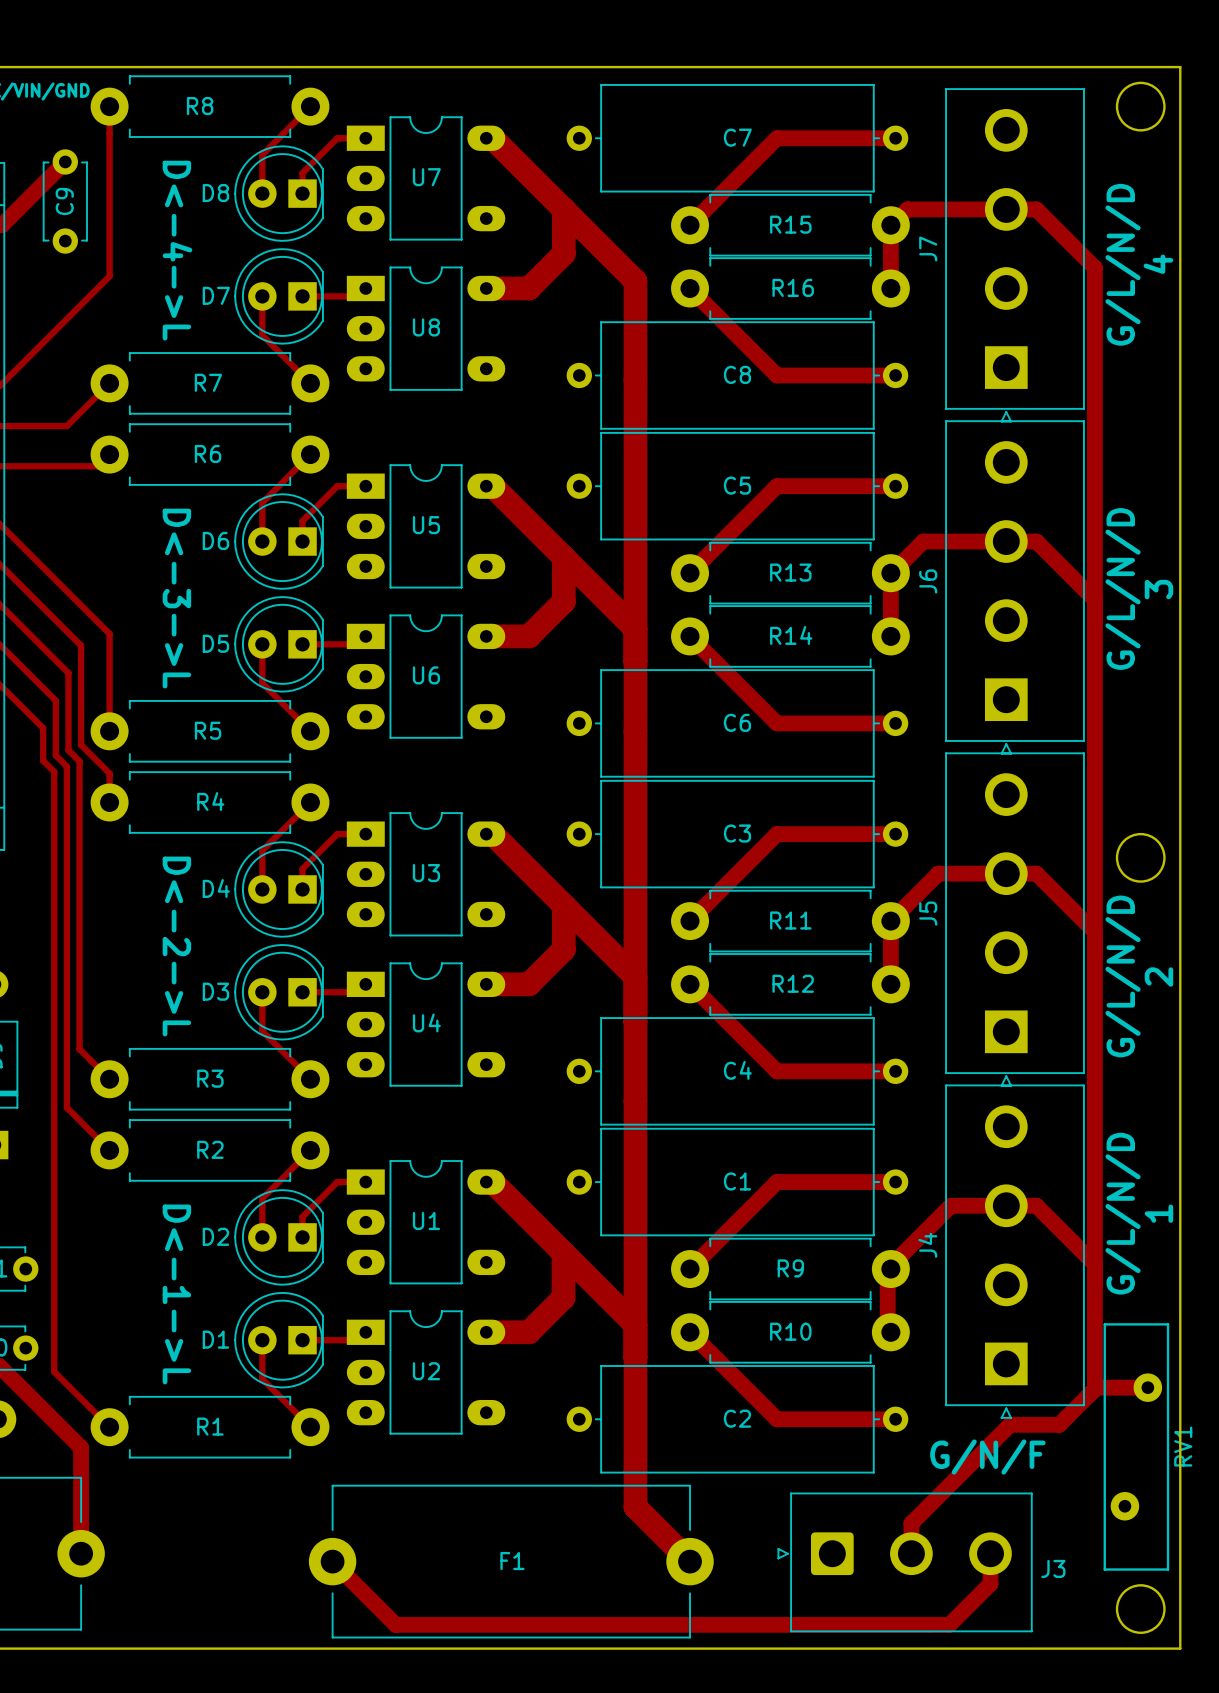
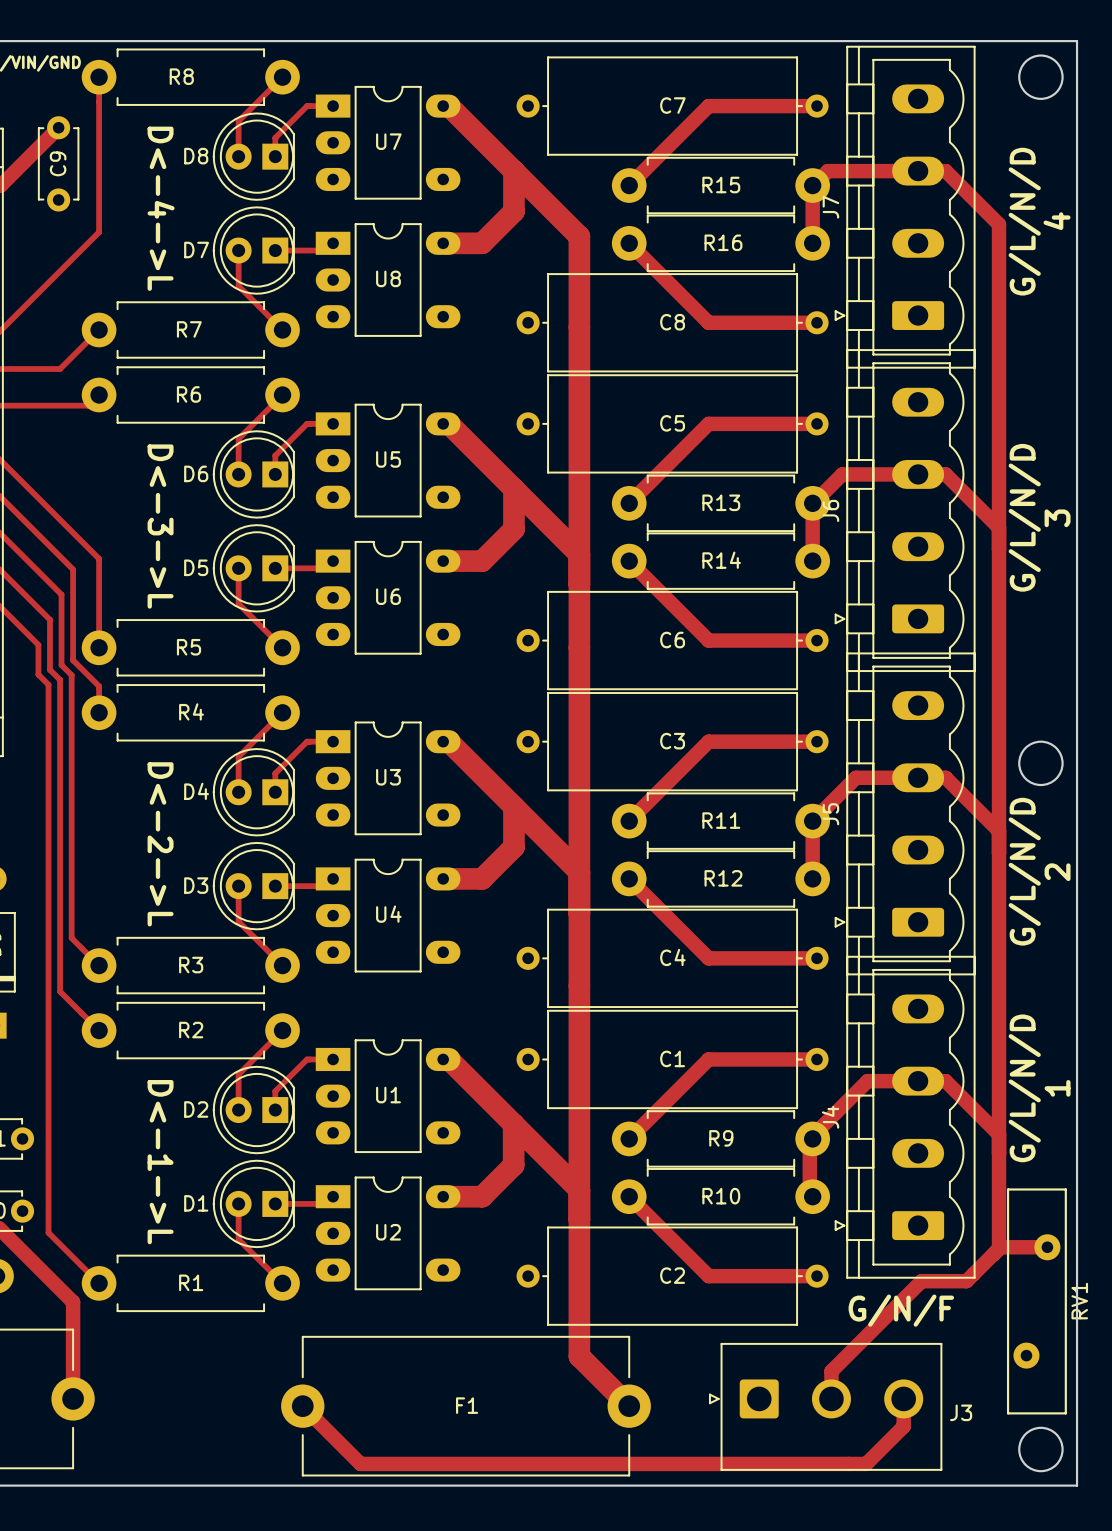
J7 footprint: [945, 88, 1085, 423] -> [834, 45, 976, 369]
J6 footprint: [945, 420, 1085, 755] -> [834, 349, 976, 672]
J5 footprint: [945, 752, 1085, 1087] -> [834, 652, 976, 976]
J4 footprint: [945, 1084, 1085, 1419] -> [834, 955, 976, 1279]

